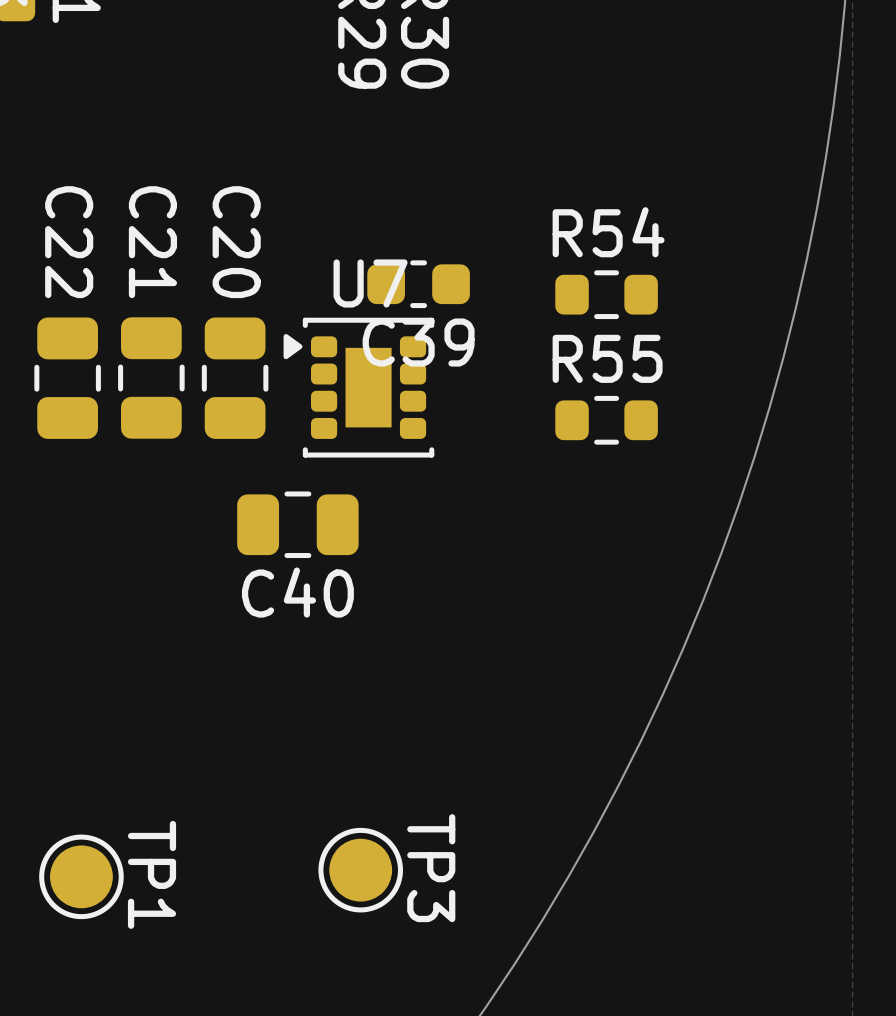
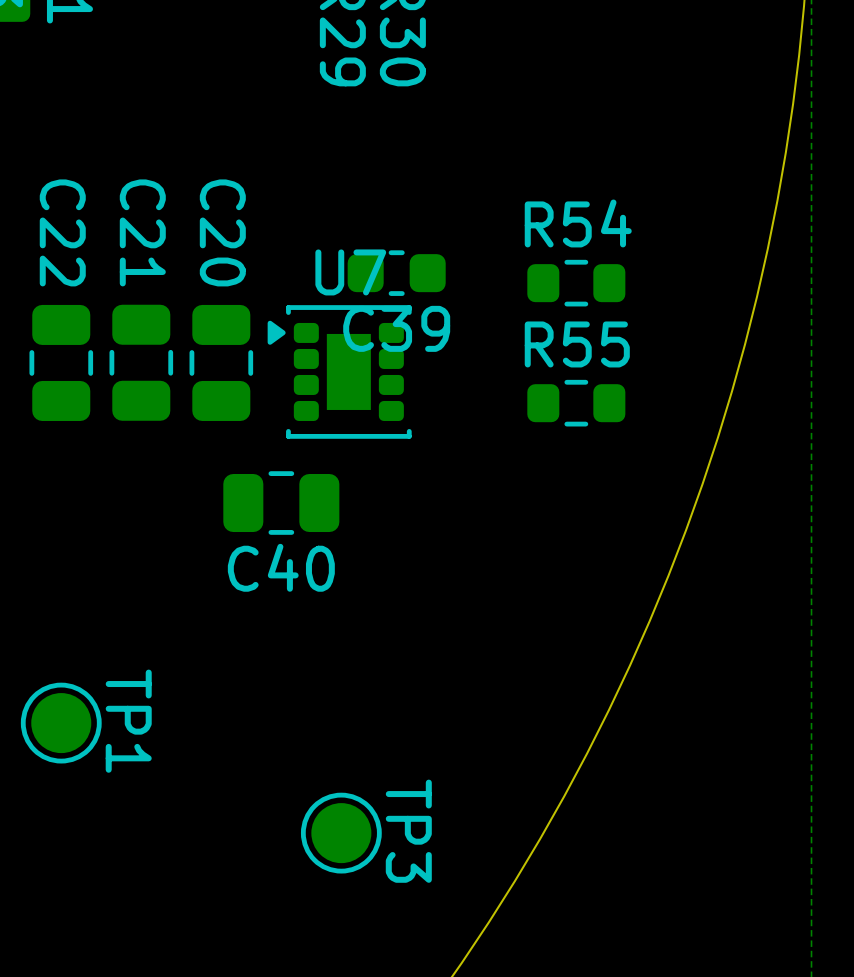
TP1 position: (81, 876) -> (61, 723)

